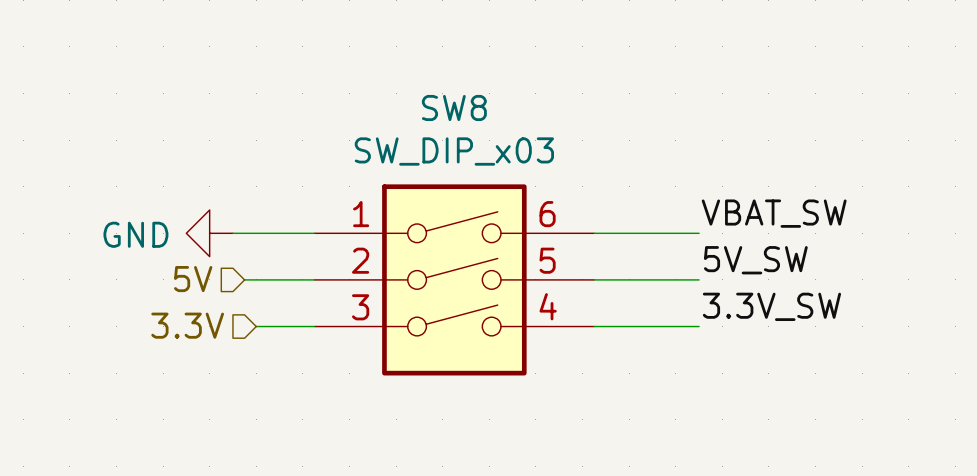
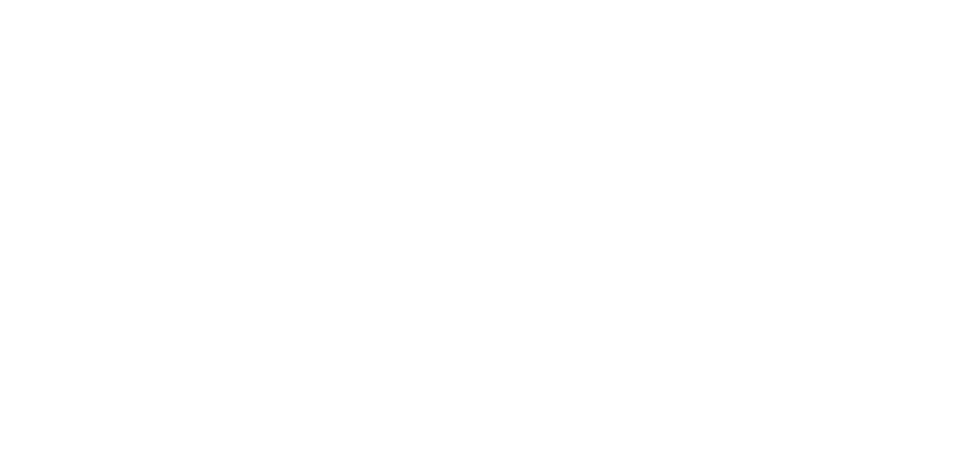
label: VBAT_SW (774, 213) -> none
power symbol: GND (209, 233) -> none
wire: (232, 233) (314, 233) -> none
wire: (594, 233) (699, 233) -> none
label: 5V_SW (755, 260) -> none
hierarchical label: 5V (193, 279) -> none
wire: (244, 279) (314, 279) -> none
SW8: SW_DIP_x03 (454, 279) -> none
wire: (594, 279) (699, 279) -> none
label: 3.3V_SW (771, 306) -> none
hierarchical label: 3.3V (187, 325) -> none
wire: (256, 326) (314, 326) -> none
wire: (594, 326) (699, 326) -> none

